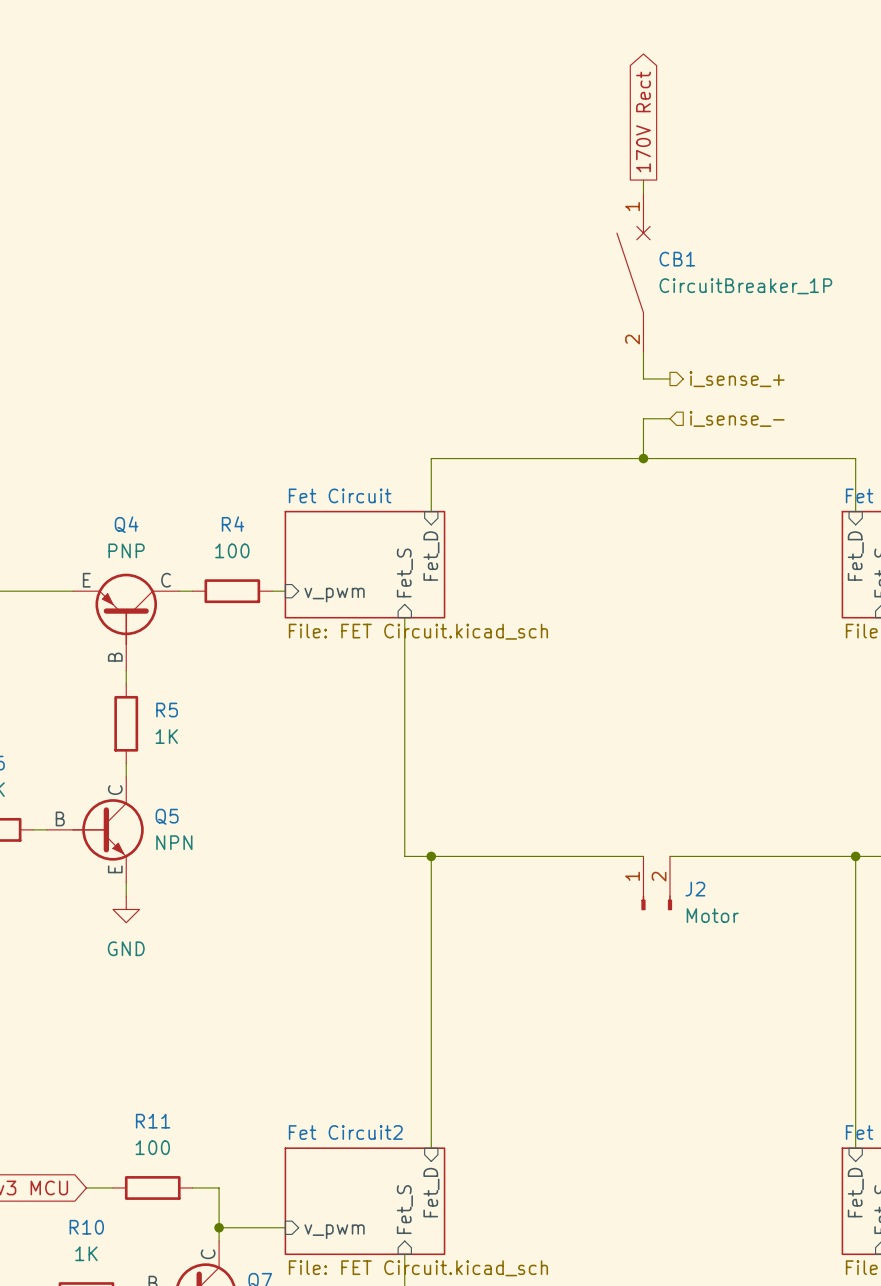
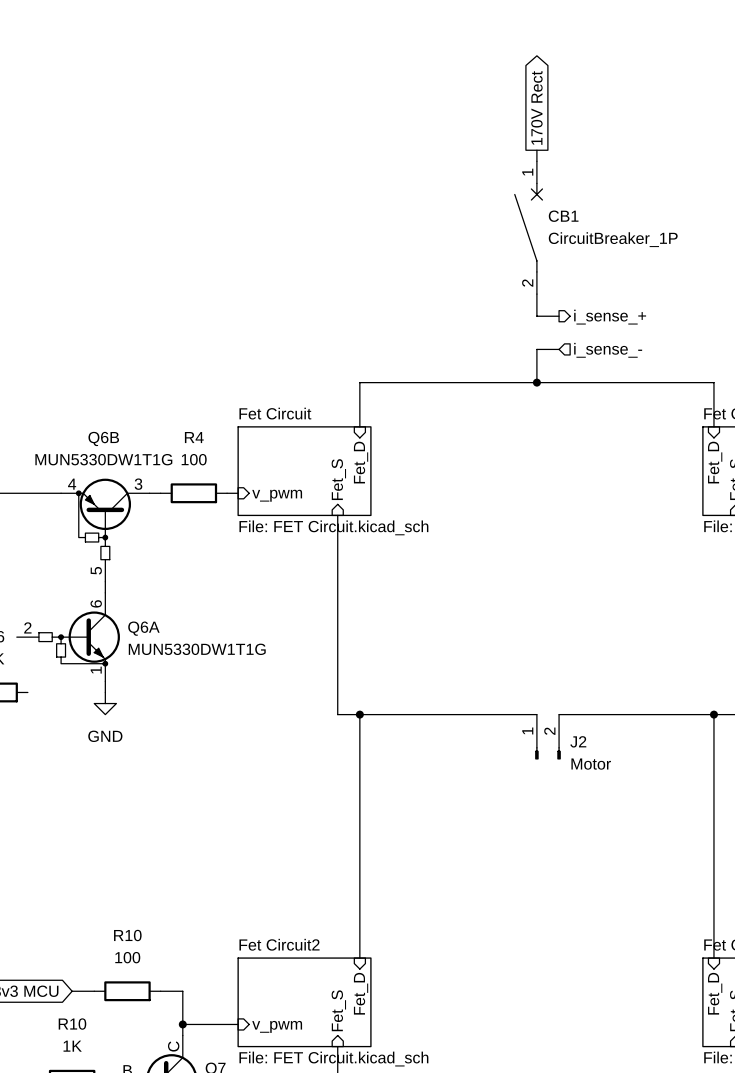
Q4: PNP (126, 622) -> none
Q6B: none -> MUN5330DW1T1G (105, 530)
R5: 1K (126, 723) -> none
Q6A: none -> MUN5330DW1T1G (68, 637)
wire: (126, 763) (126, 776) -> (105, 581) (105, 592)
wire: (33, 829) (46, 829) -> none
Q5: NPN (95, 829) -> none
wire: (126, 882) (126, 896) -> (105, 681) (105, 692)
power symbol position: GND (126, 909) -> GND (105, 703)
R11 name: R11 (153, 1121) -> R10 (127, 935)

